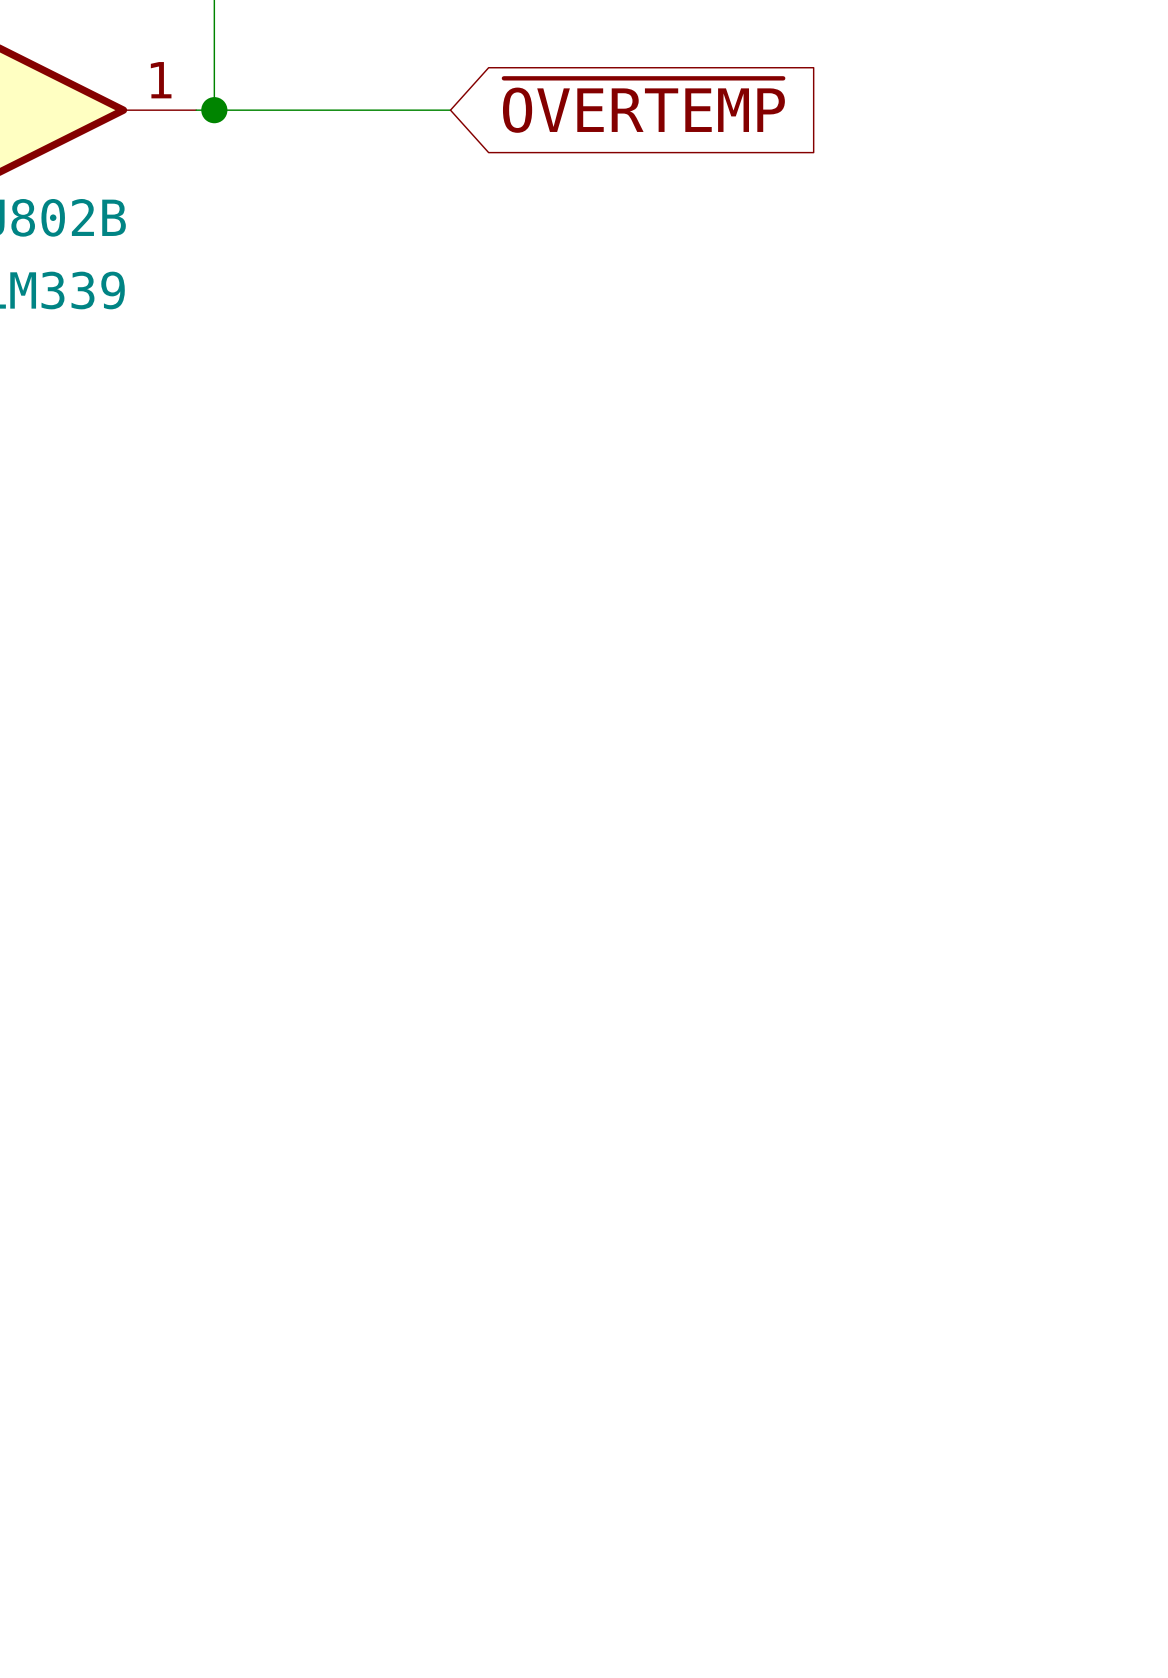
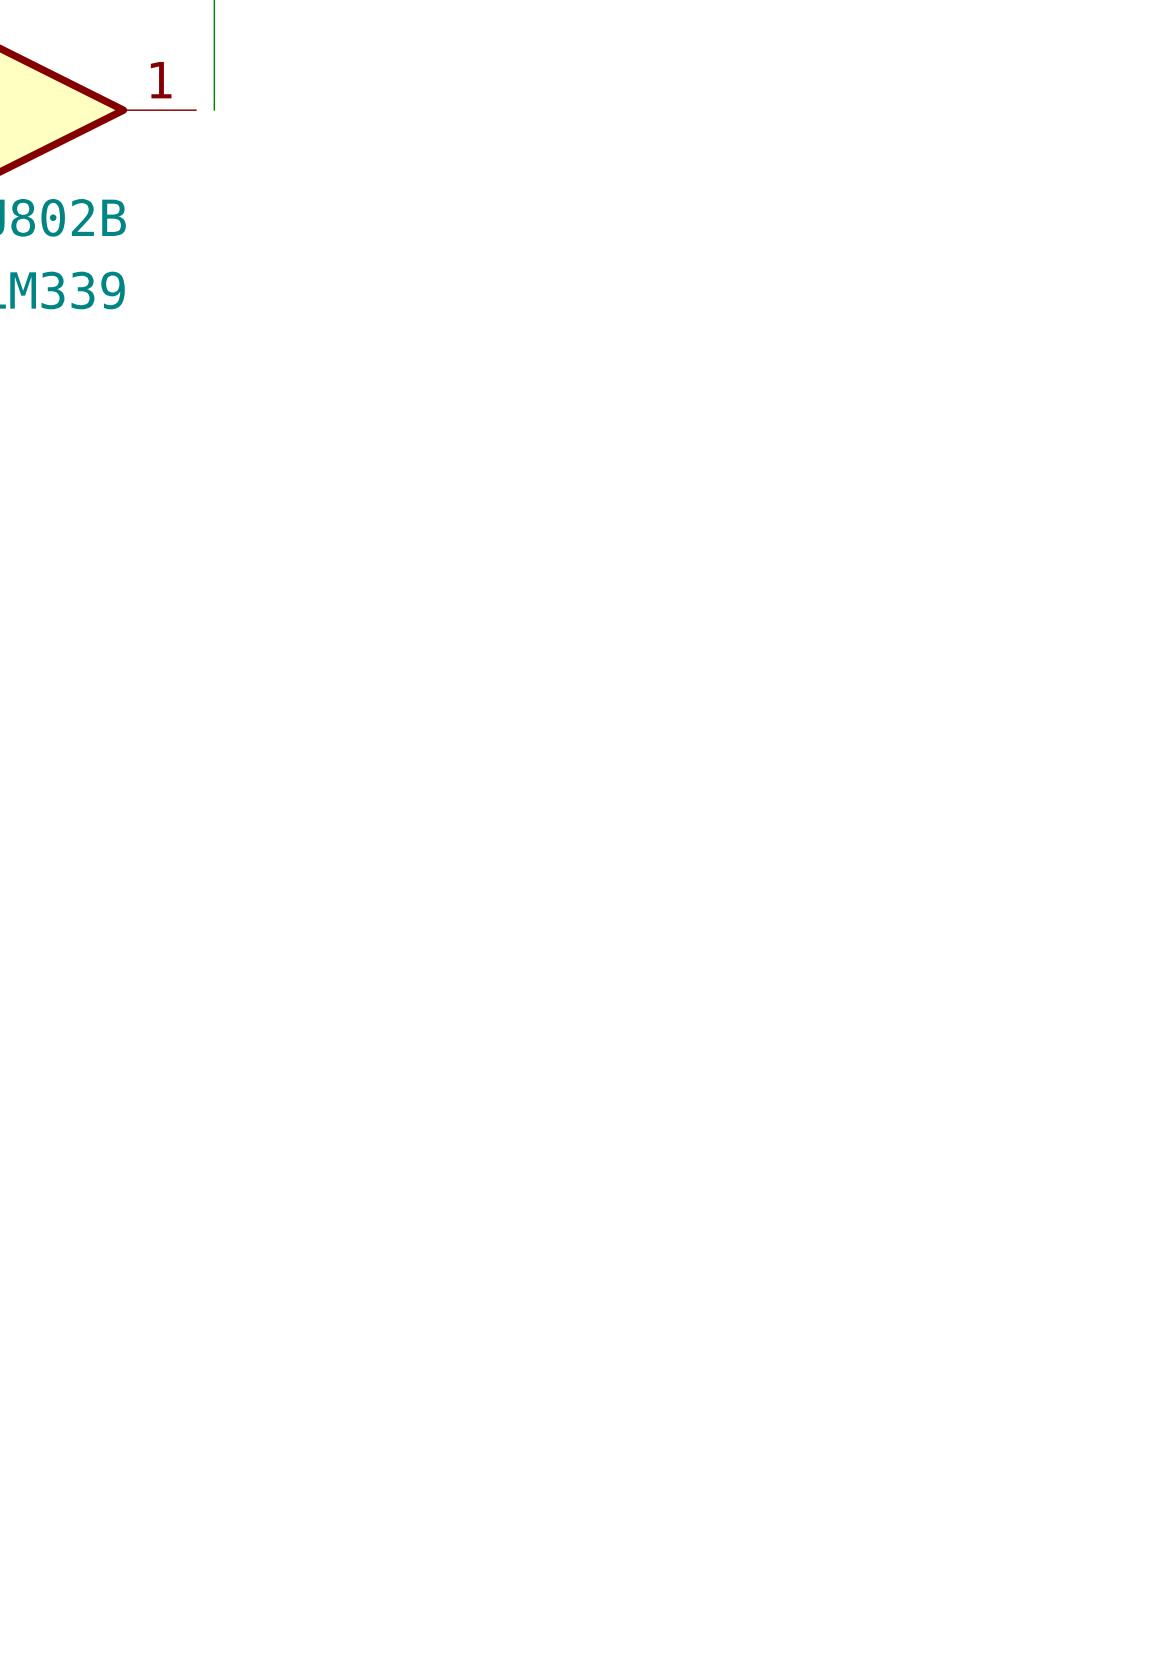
global label: ~{OVERTEMP} (643, 105) -> none
wire: (196, 110) (450, 110) -> none
junction: (214, 110) -> none

